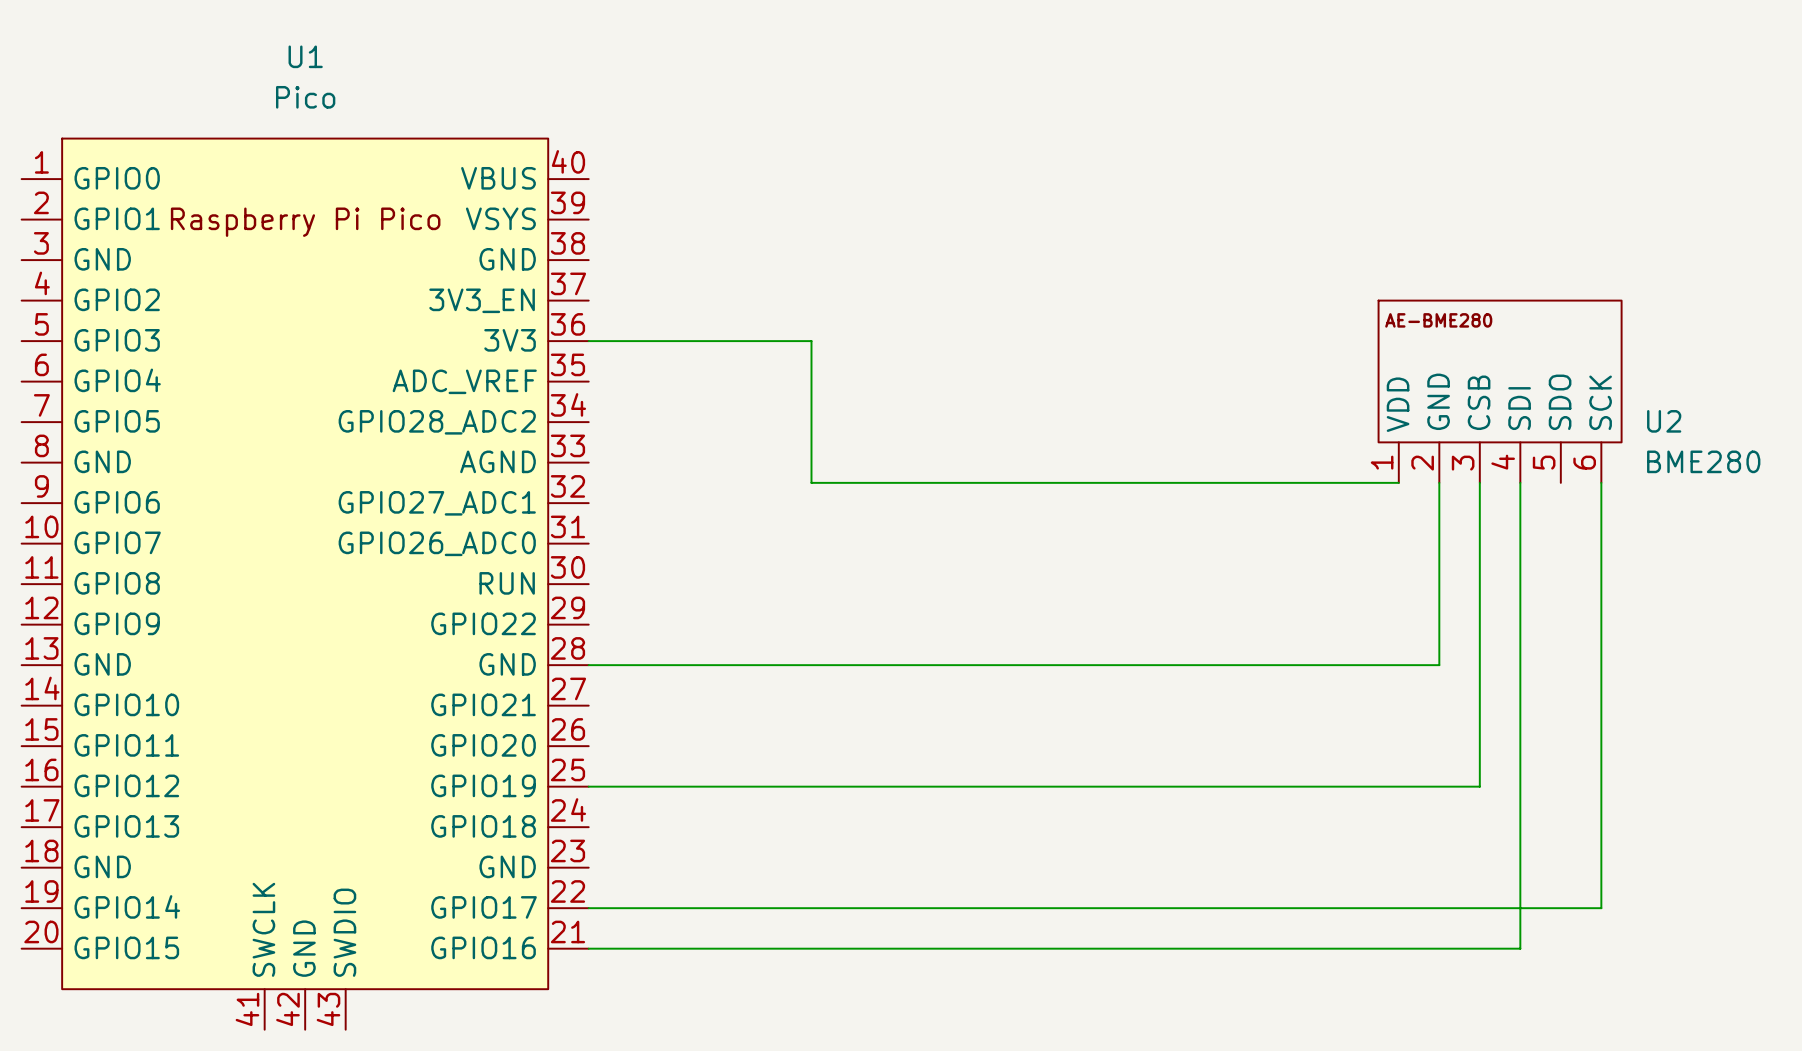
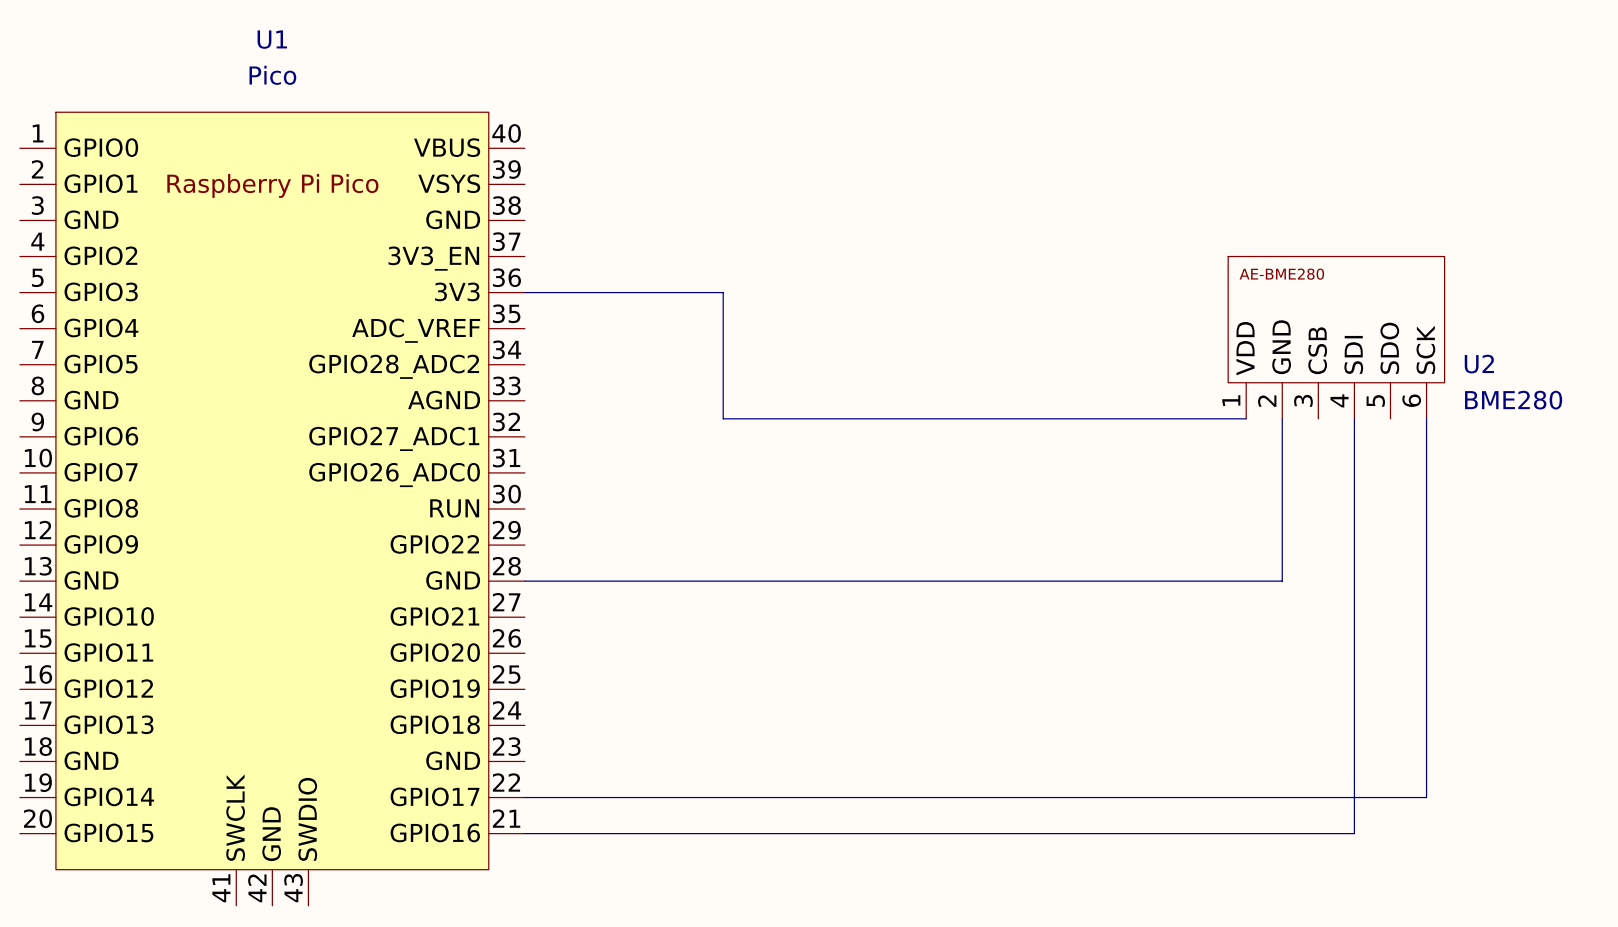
wire: (1479, 482) (1479, 786) (588, 786) -> none

